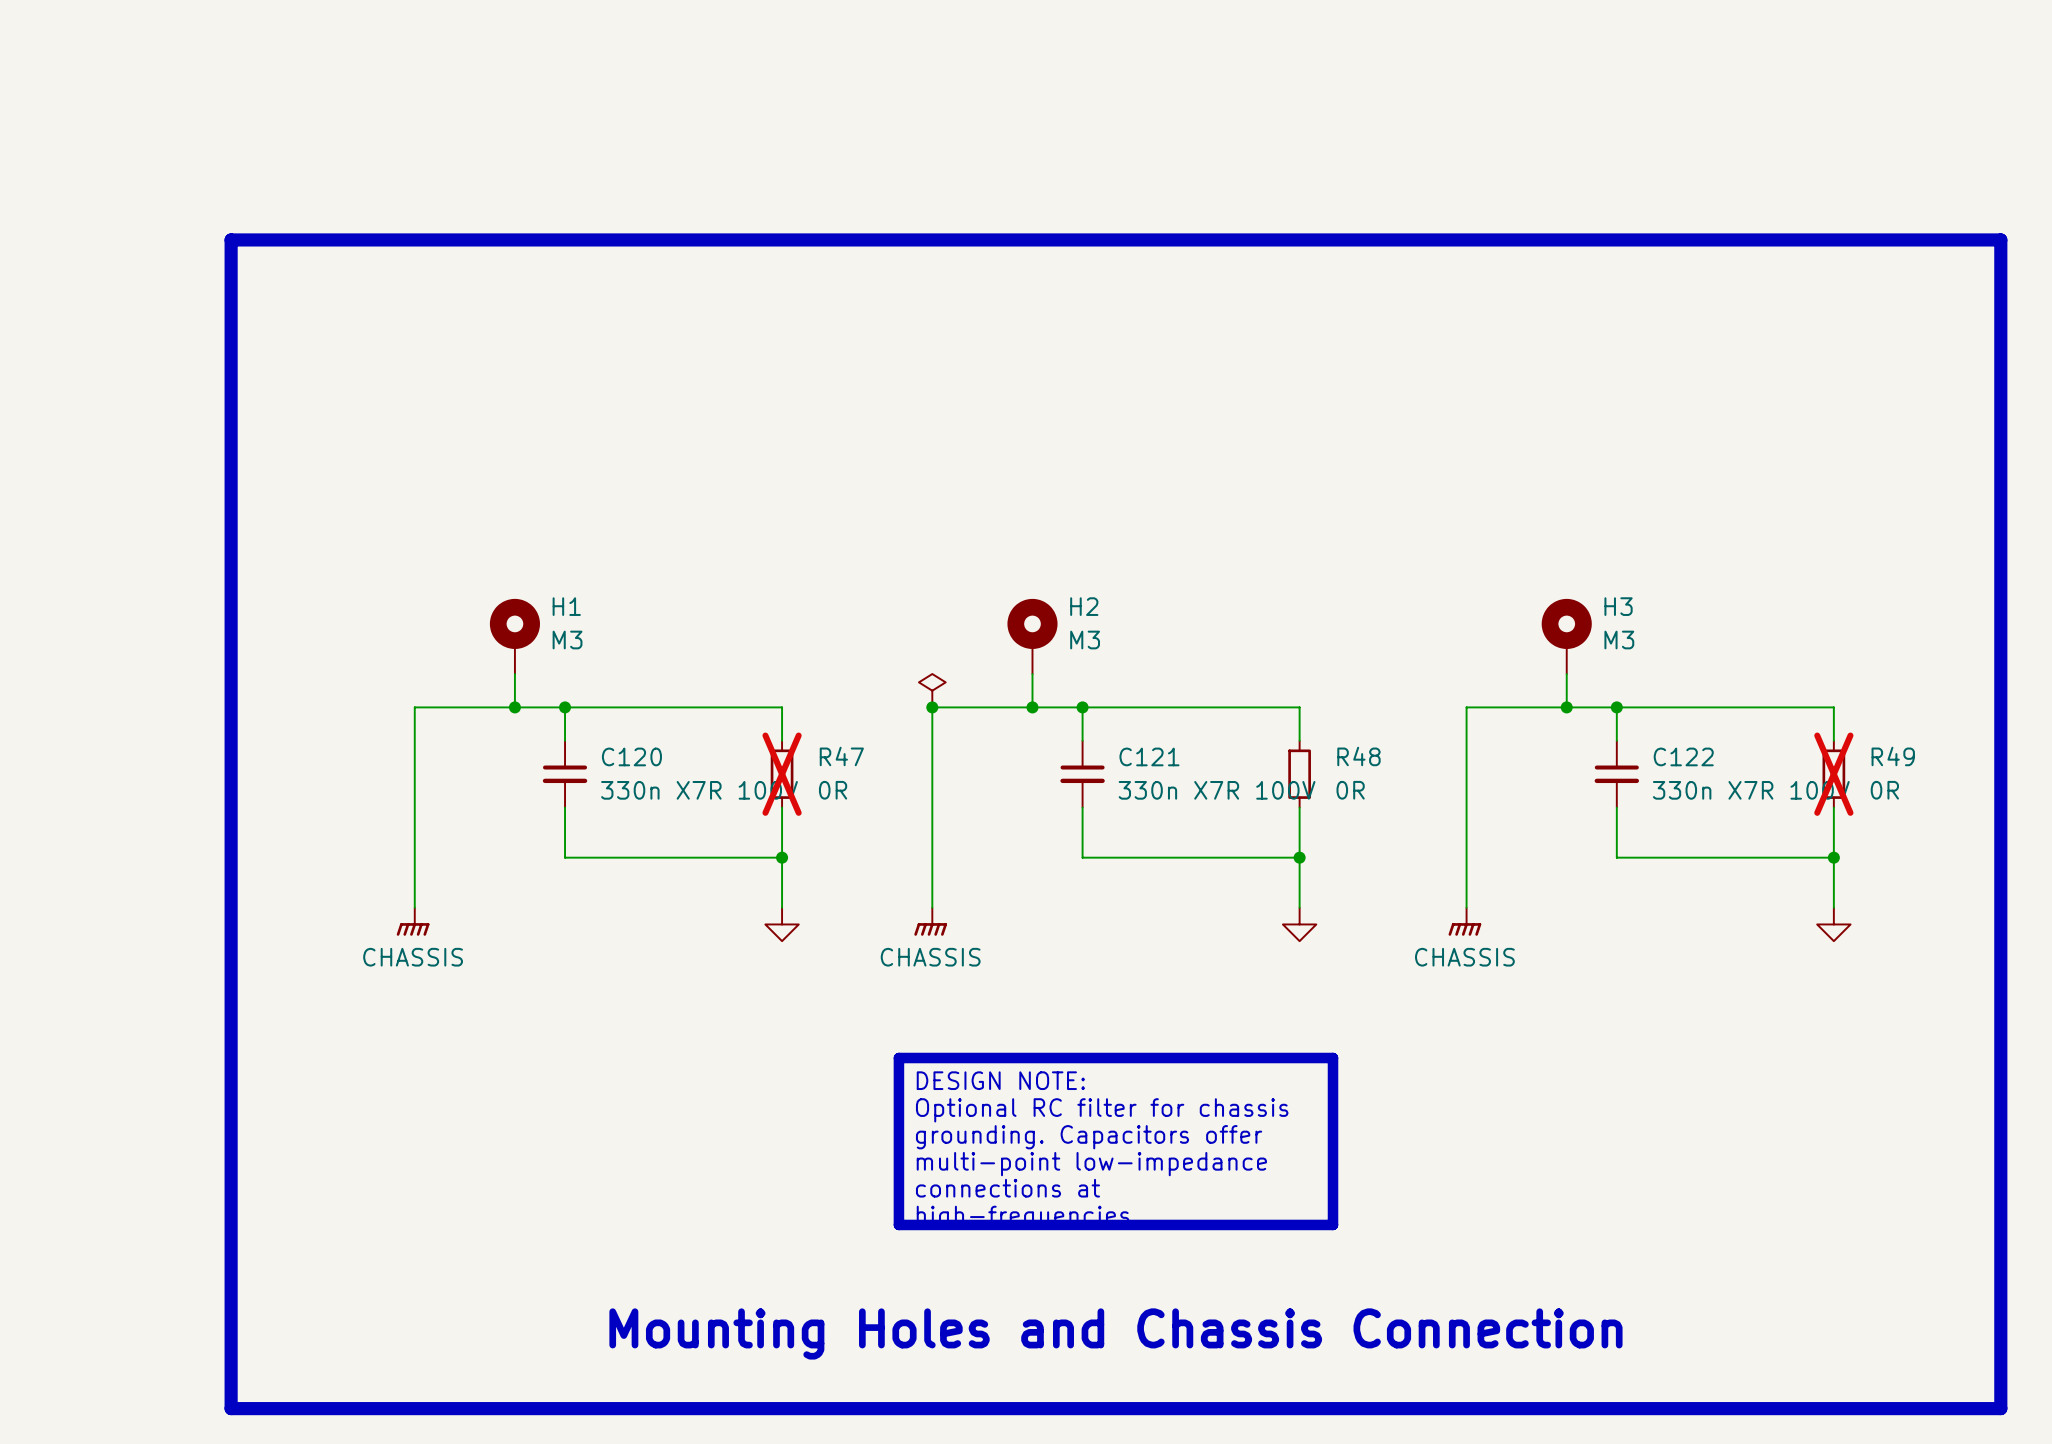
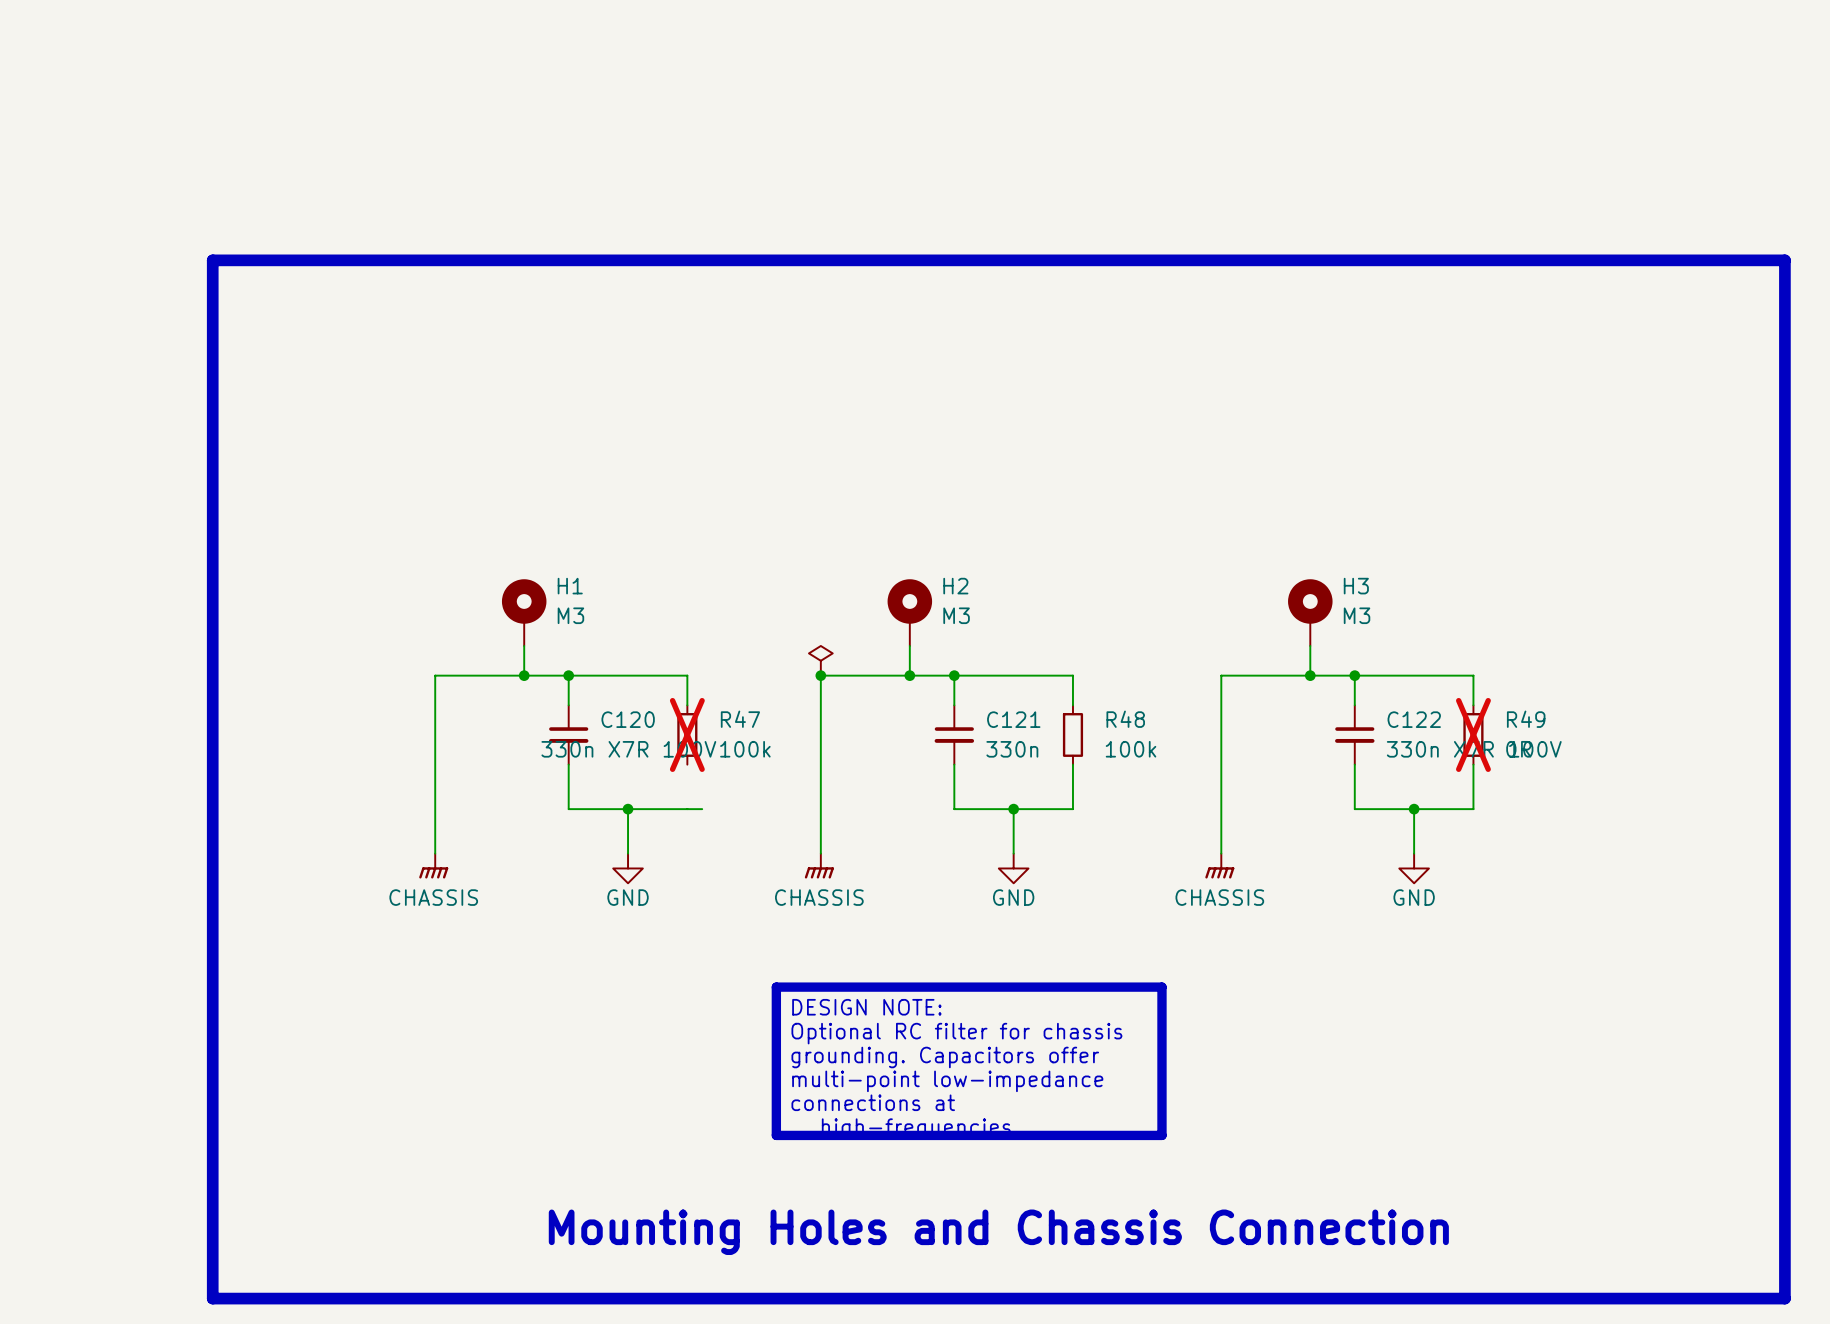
H1 position: (514, 636) -> (524, 612)
H2 position: (1032, 636) -> (909, 612)
H3 position: (1566, 636) -> (1310, 612)
wire: (514, 674) (514, 707) -> (524, 645) (524, 675)
wire: (1032, 674) (1032, 707) -> (909, 645) (909, 675)
wire: none -> (1310, 645) (1310, 675) (1221, 675) (1221, 853)
wire: (1566, 674) (1566, 707) -> (1354, 675) (1354, 705)
power symbol position: (932, 690) -> (820, 660)
wire: (481, 707) (414, 707) (414, 907) -> (435, 675) (435, 853)
junction: (514, 707) -> none
wire: (565, 707) (565, 740) -> (568, 675) (568, 705)
junction position: (565, 707) -> (524, 675)
junction: none -> (568, 675)
wire: (765, 707) (782, 707) (782, 740) -> (687, 675) (687, 705)
wire: (932, 707) (932, 907) -> (835, 675) (820, 675) (820, 853)
junction position: (932, 707) -> (820, 675)
junction: none -> (909, 675)
junction: (1032, 707) -> none
junction: none -> (954, 675)
wire: (1082, 707) (1082, 740) -> (954, 675) (954, 705)
junction: (1082, 707) -> none
wire: (1199, 707) (1299, 707) (1299, 740) -> (1072, 675) (1072, 705)
wire: (1466, 707) (1466, 907) -> none
junction: none -> (1310, 675)
junction: none -> (1354, 675)
junction: (1566, 707) -> none
wire: (1616, 707) (1616, 740) -> none
junction: (1616, 707) -> none
wire: (1650, 707) (1833, 707) (1833, 740) -> (1473, 675) (1473, 705)
C120 position: (565, 774) -> (568, 734)
R47 position: (782, 774) -> (687, 734)
C121 position: (1082, 774) -> (954, 734)
R48 position: (1299, 774) -> (1072, 734)
C122 position: (1616, 774) -> (1354, 734)
R49 position: (1833, 774) -> (1473, 734)
R47 value: 0R (833, 790) -> 100k (745, 749)
C121 value: 330n X7R 100V (1217, 790) -> 330n (1012, 749)
R48 value: 0R (1350, 790) -> 100k (1131, 749)
wire: (565, 807) (565, 857) (631, 857) -> (568, 764) (568, 809)
wire: (782, 807) (782, 907) -> none
wire: (1082, 807) (1082, 857) -> (954, 764) (954, 809) (969, 809)
wire: (1299, 807) (1299, 907) -> none
wire: (1616, 807) (1616, 857) -> (1354, 764) (1354, 809) (1443, 809)
wire: (1833, 807) (1833, 907) -> none
wire: none -> (628, 809) (628, 853)
junction: none -> (628, 809)
junction: (782, 857) -> none
wire: none -> (1013, 809) (1013, 853)
junction: none -> (1013, 809)
wire: (1199, 857) (1299, 857) -> (1072, 809) (1072, 764)
junction: (1299, 857) -> none
wire: none -> (1414, 809) (1414, 853)
junction: none -> (1414, 809)
wire: (1650, 857) (1833, 857) -> (1473, 809) (1473, 764)
junction: (1833, 857) -> none
power symbol position: CHASSIS (413, 921) -> CHASSIS (433, 866)
power symbol position: CHASSIS (930, 921) -> CHASSIS (819, 866)
power symbol position: CHASSIS (1464, 921) -> CHASSIS (1219, 866)
power symbol: none -> GND (628, 868)
power symbol: (782, 924) -> none
power symbol: none -> GND (1013, 868)
power symbol: (1299, 924) -> none
power symbol: none -> GND (1414, 868)
power symbol: (1833, 924) -> none
line: (898, 1058) (898, 1224) -> (806, 987) (776, 987) (776, 1135) (806, 1135)
line: (1299, 1058) (1333, 1058) (1333, 1224) (1299, 1224) -> (1161, 987) (1161, 1135)
text position: DESIGN NOTE: (1000, 1080) -> DESIGN NOTE: (866, 1007)
text position: Optional RC filter for chassis (1102, 1110) -> Optional RC filter for chassis (956, 1033)
text position: grounding. Capacitors offer (1089, 1137) -> grounding. Capacitors offer (945, 1057)
text position: multi-point low-impedance (1091, 1164) -> multi-point low-impedance (947, 1081)
text position: connections at (1007, 1188) -> connections at (873, 1102)

